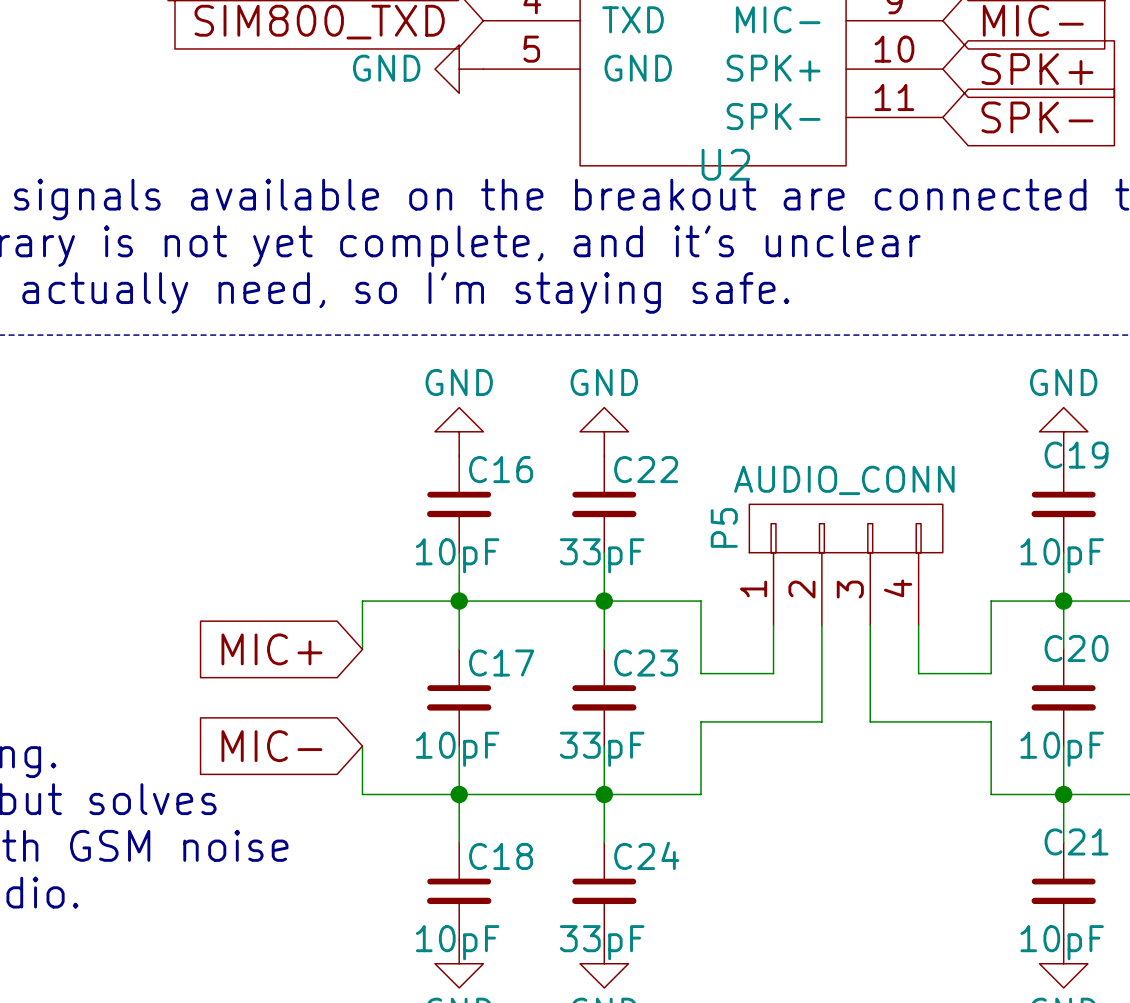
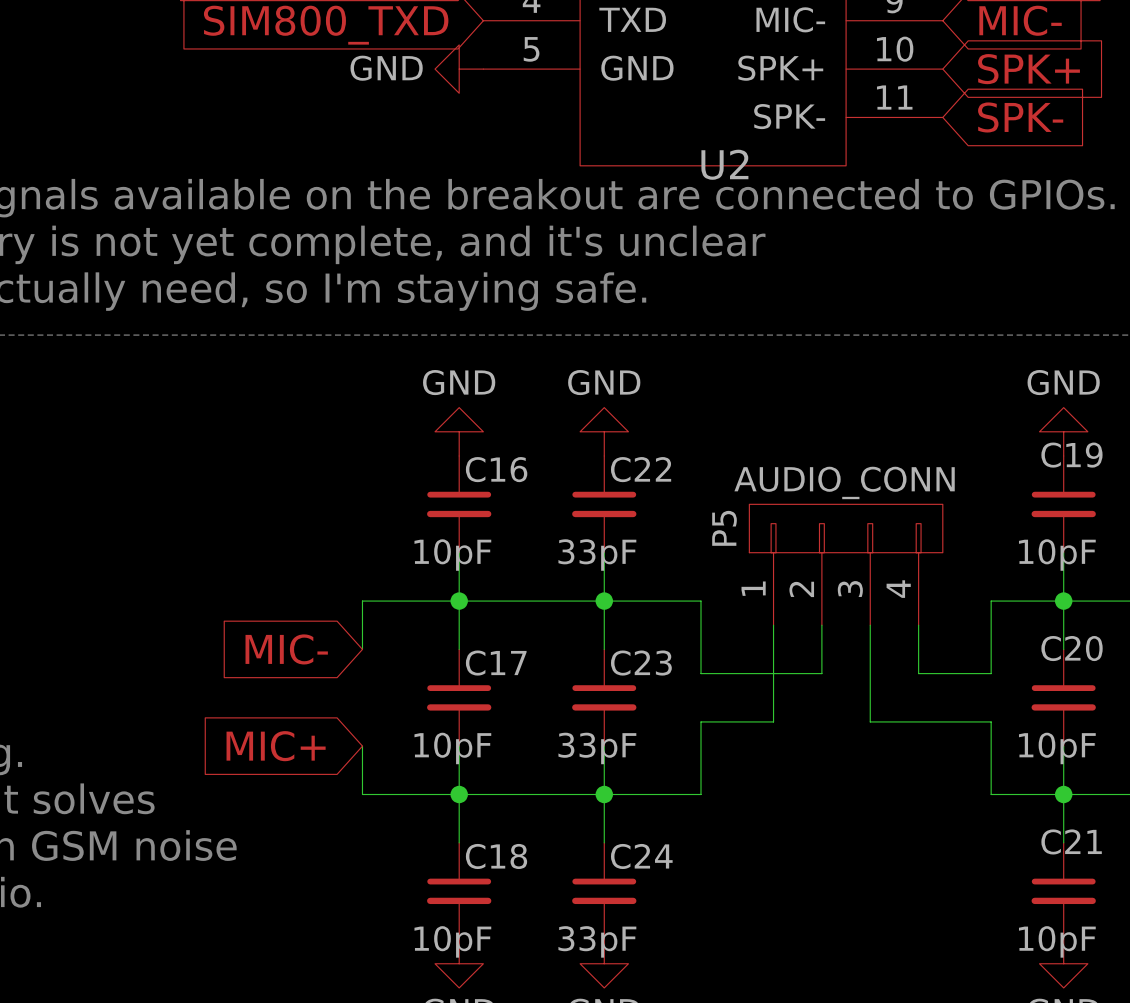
global label: MIC+ (271, 649) -> MIC- (286, 649)
wire: (821, 673) (821, 721) (773, 721) -> (821, 673) (773, 673) (773, 721)
global label: MIC- (271, 746) -> MIC+ (276, 746)

